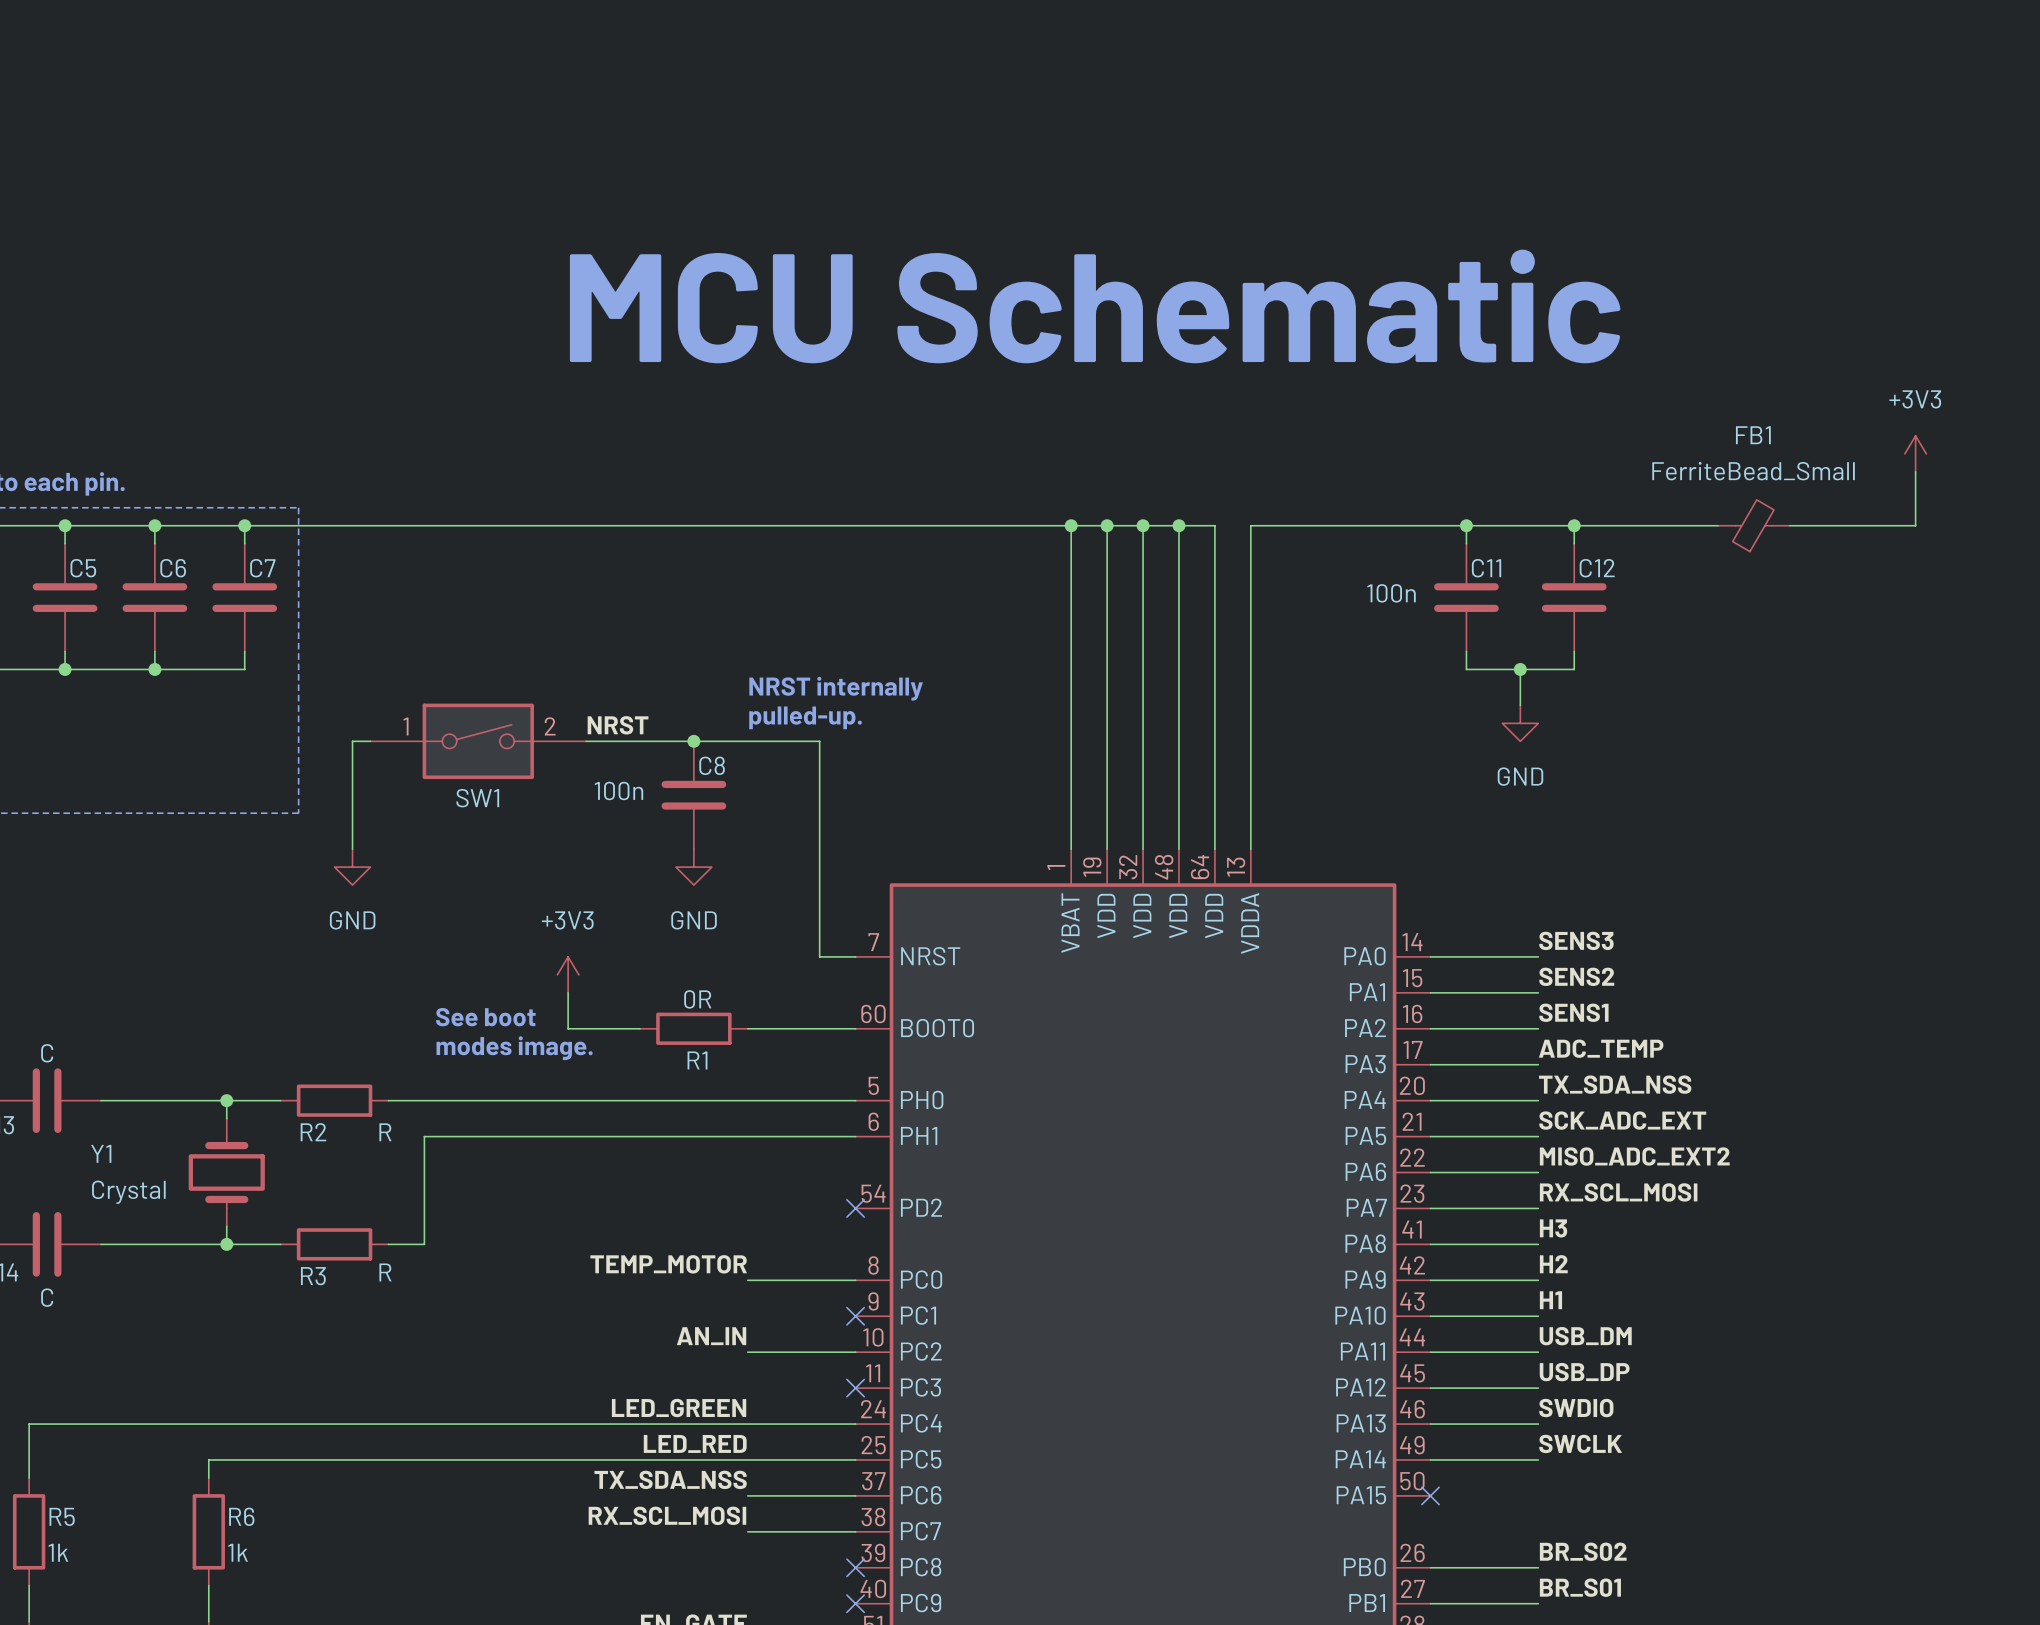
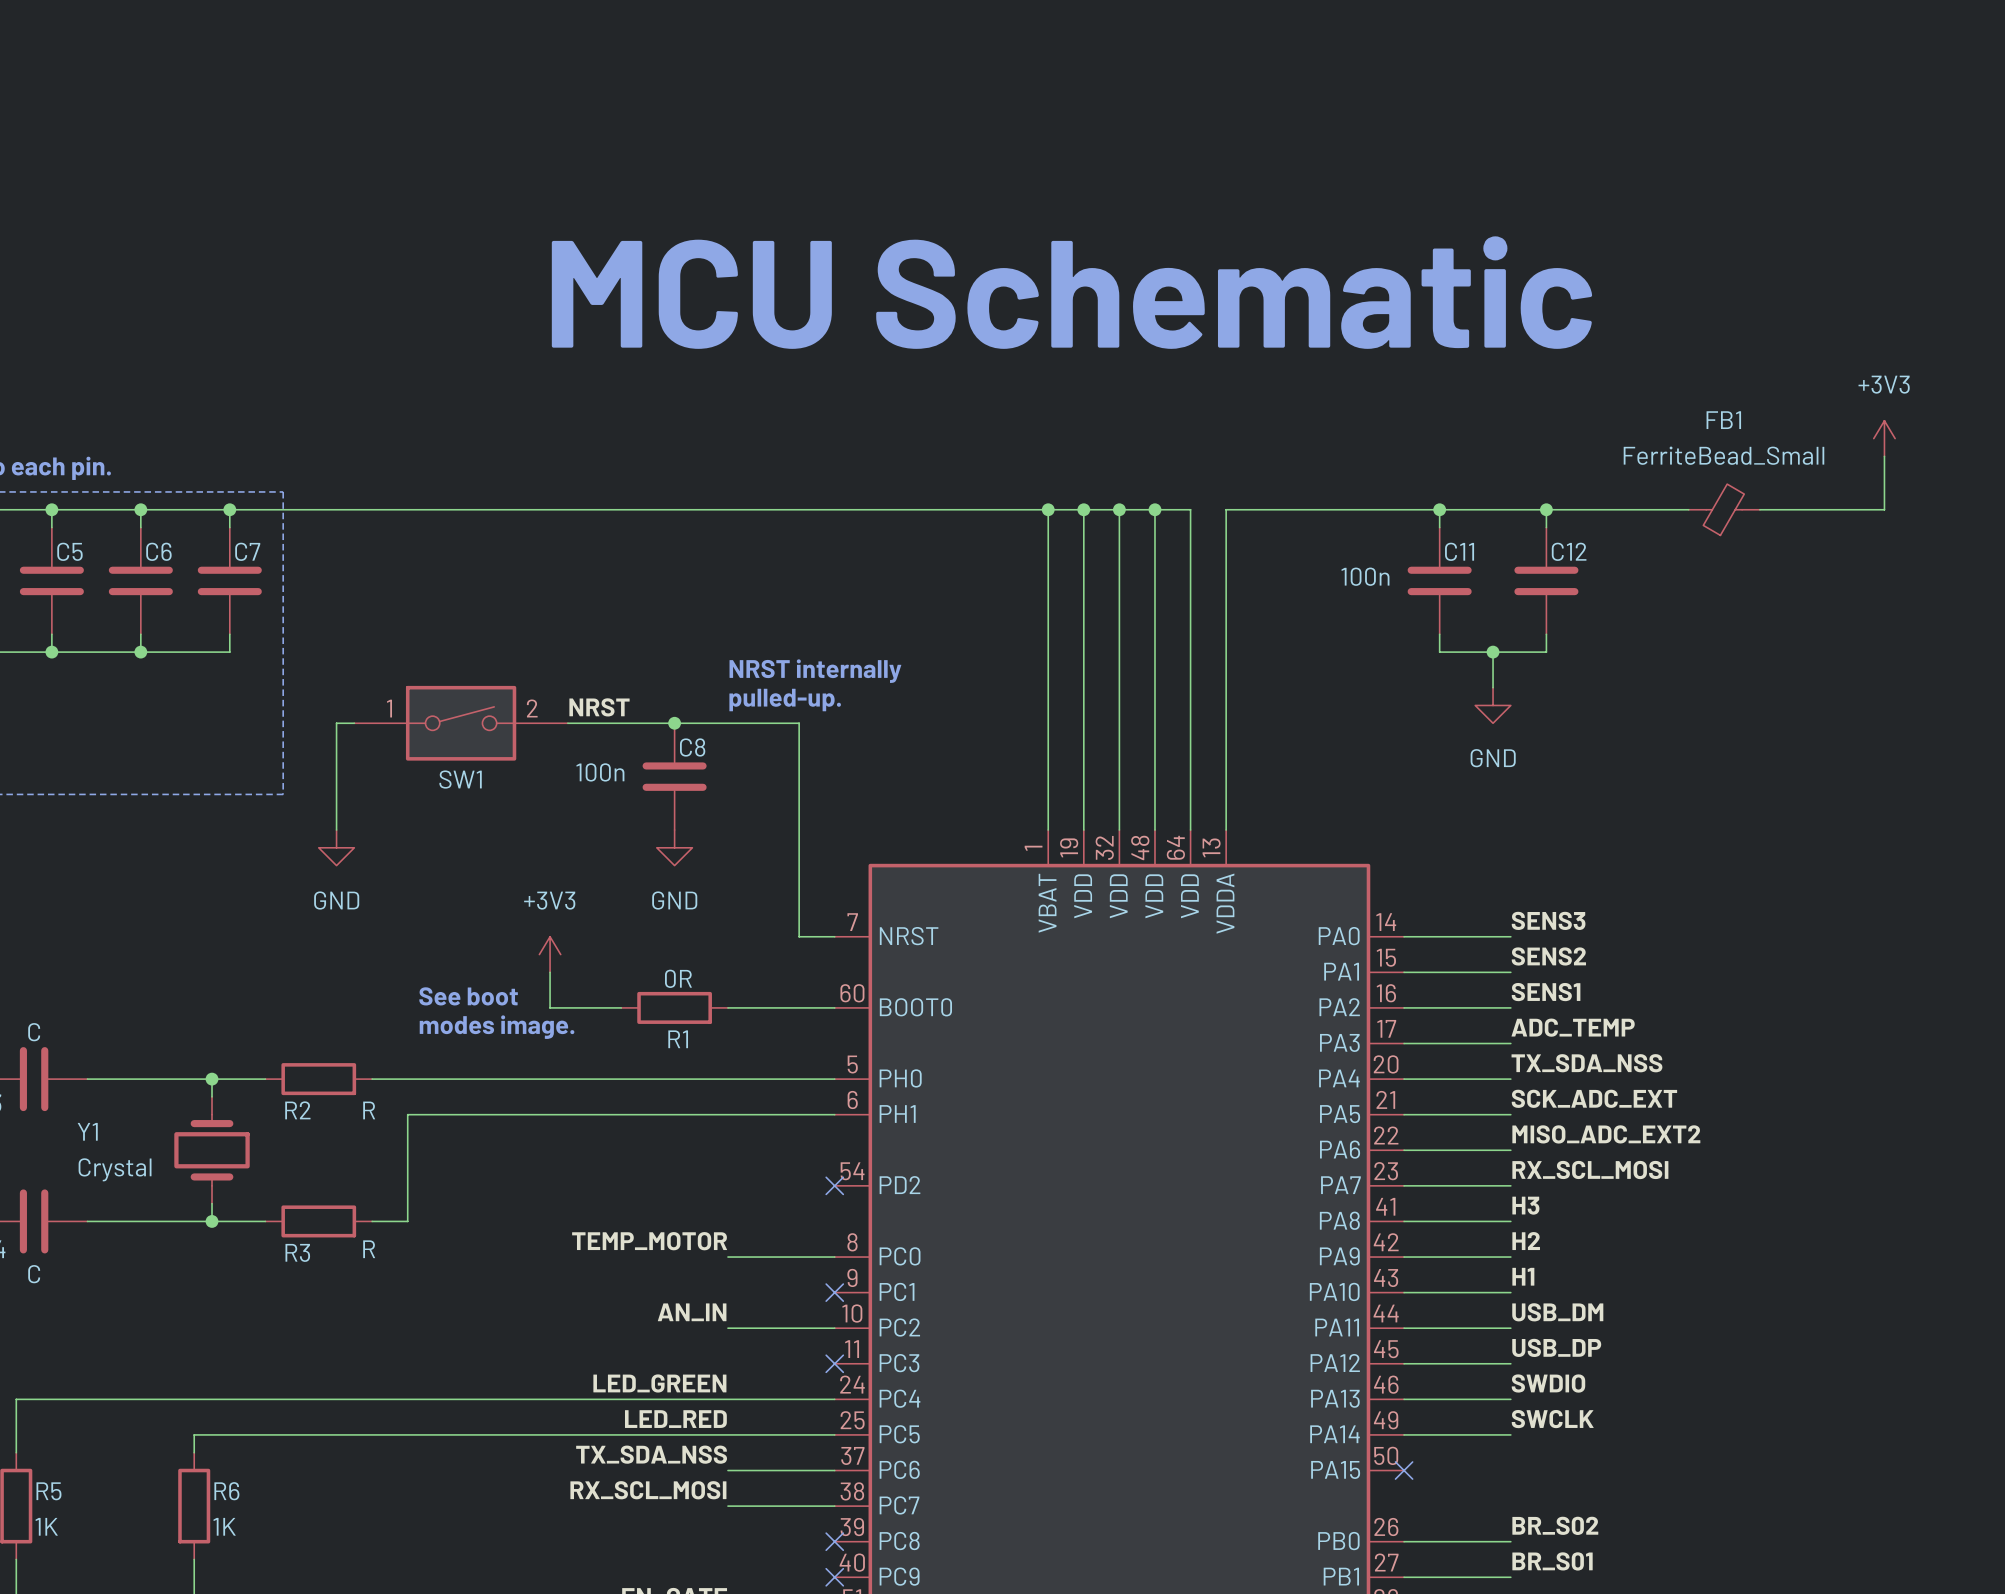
R5 value: 1k (58, 1552) -> 1K (46, 1526)
R6 value: 1k (238, 1552) -> 1K (224, 1526)

